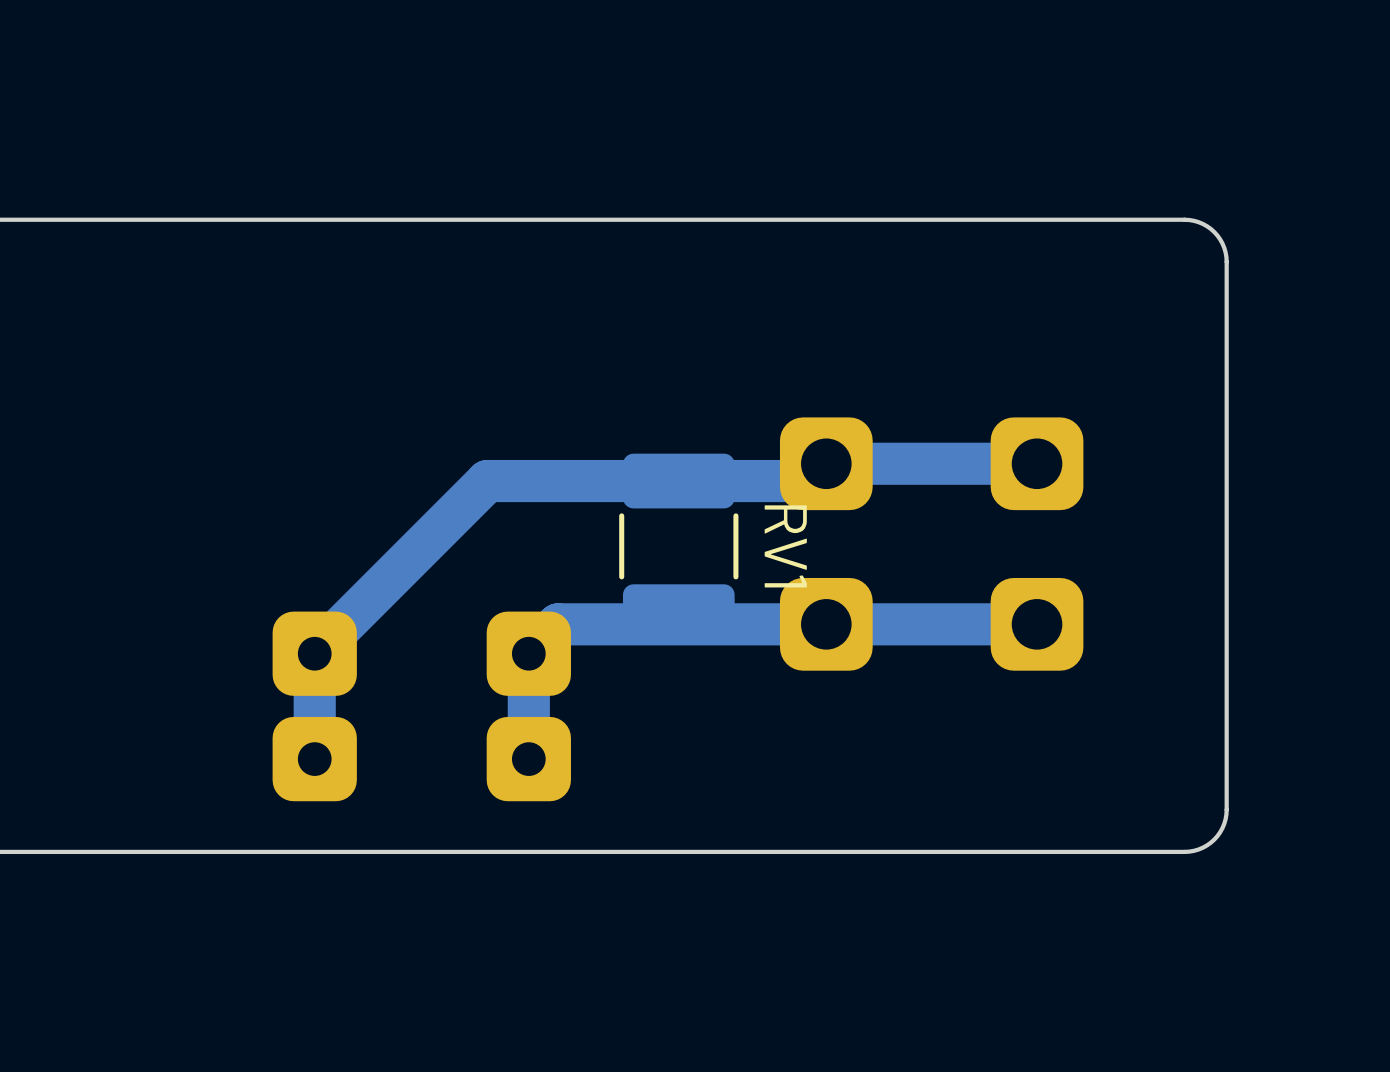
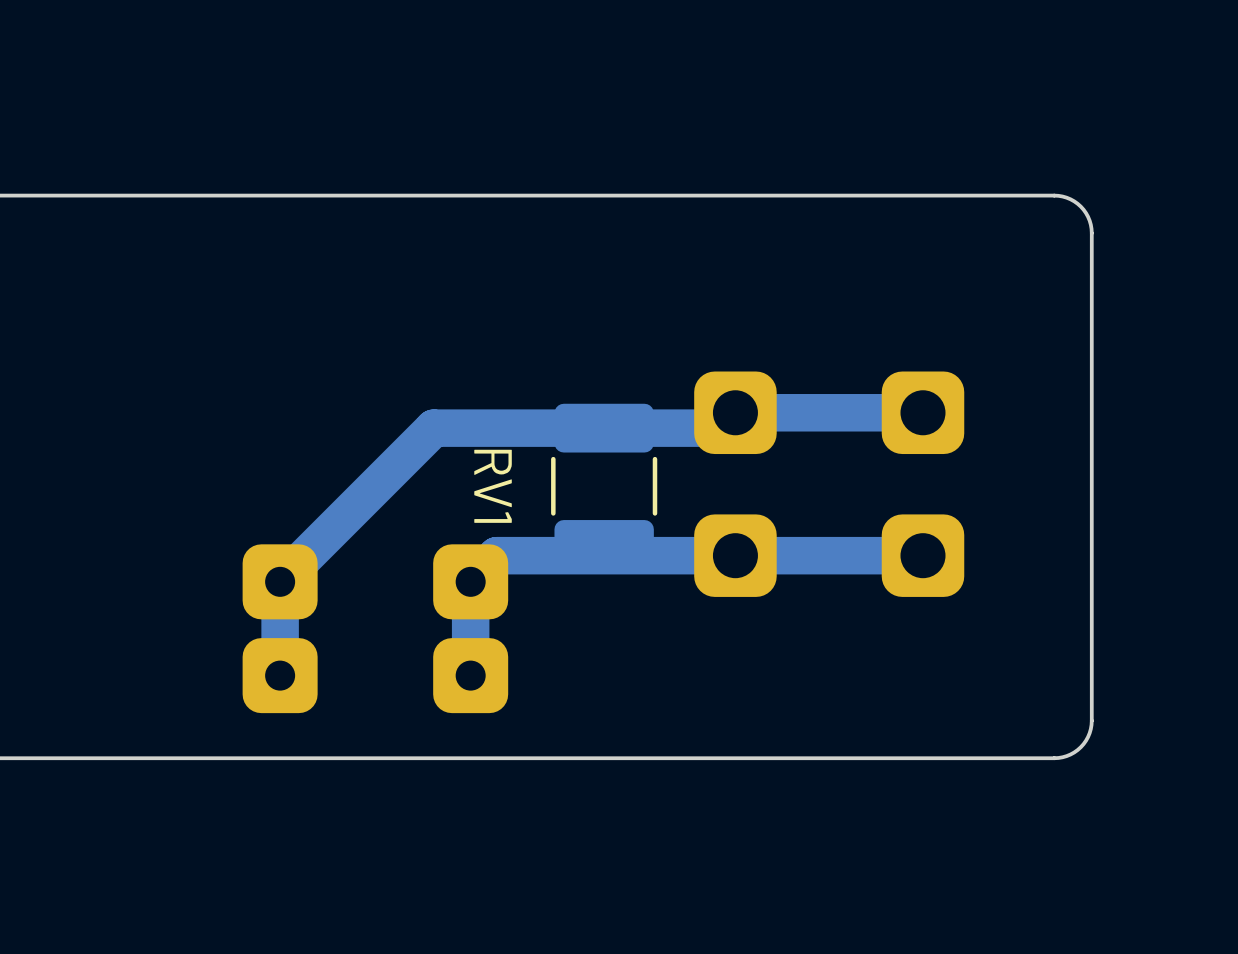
RV1 name position: RV1 (785, 546) -> RV1 (493, 486)

